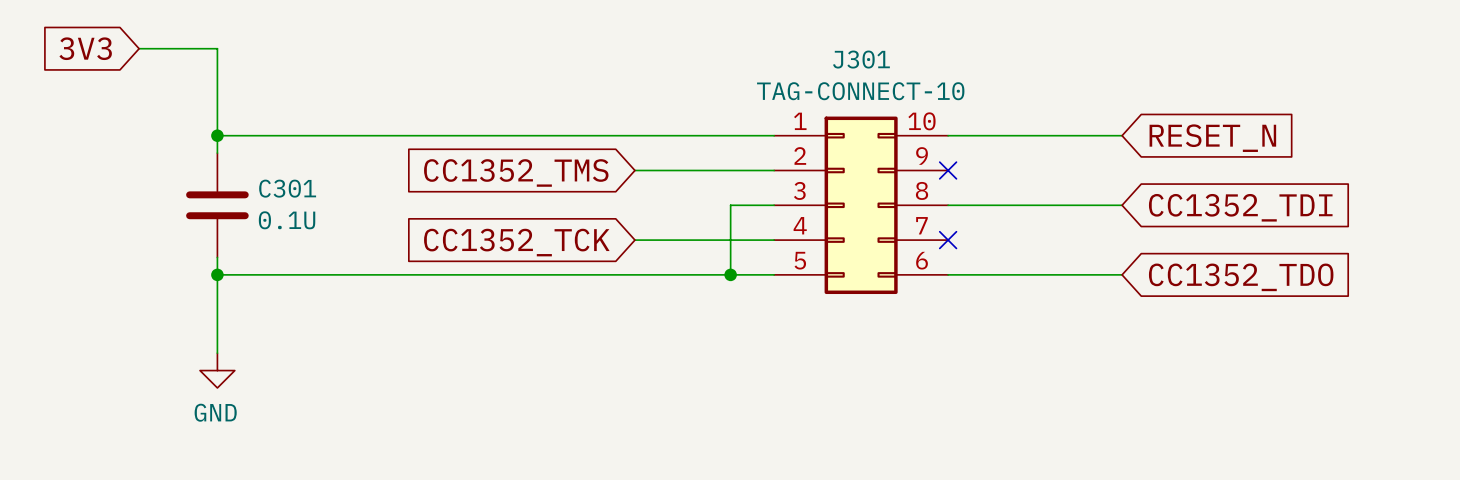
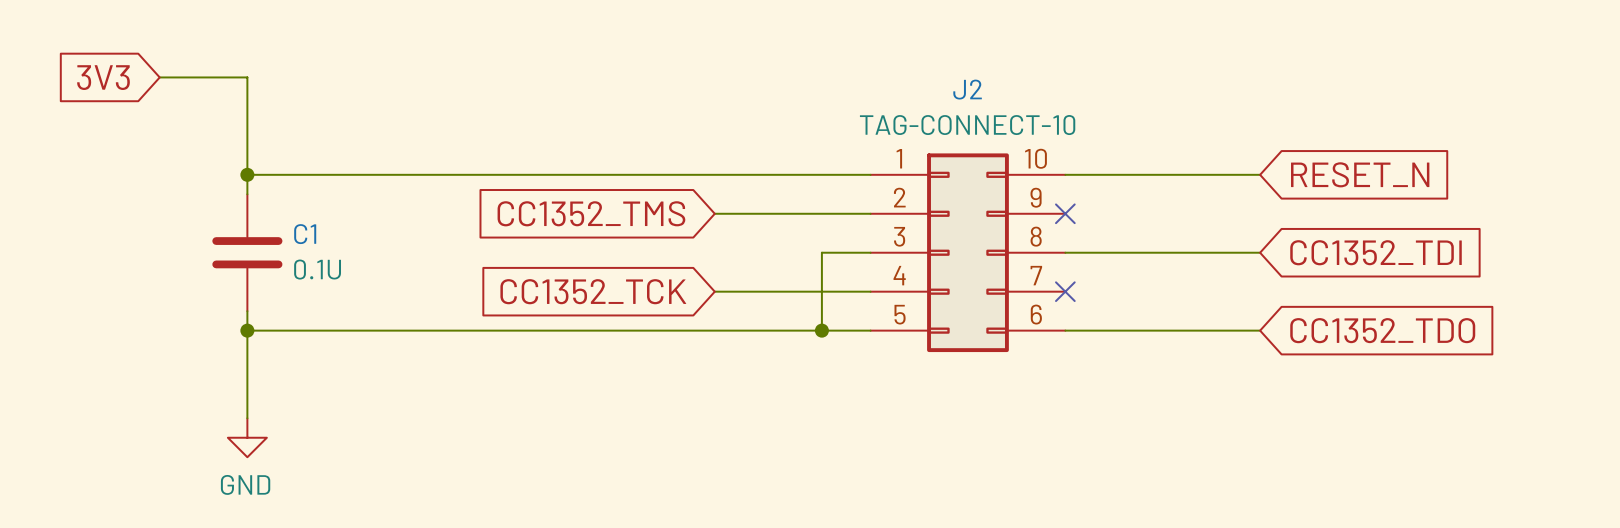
J301 name: J301 (861, 59) -> J2 (967, 89)
C301 name: C301 (287, 188) -> C1 (305, 234)

